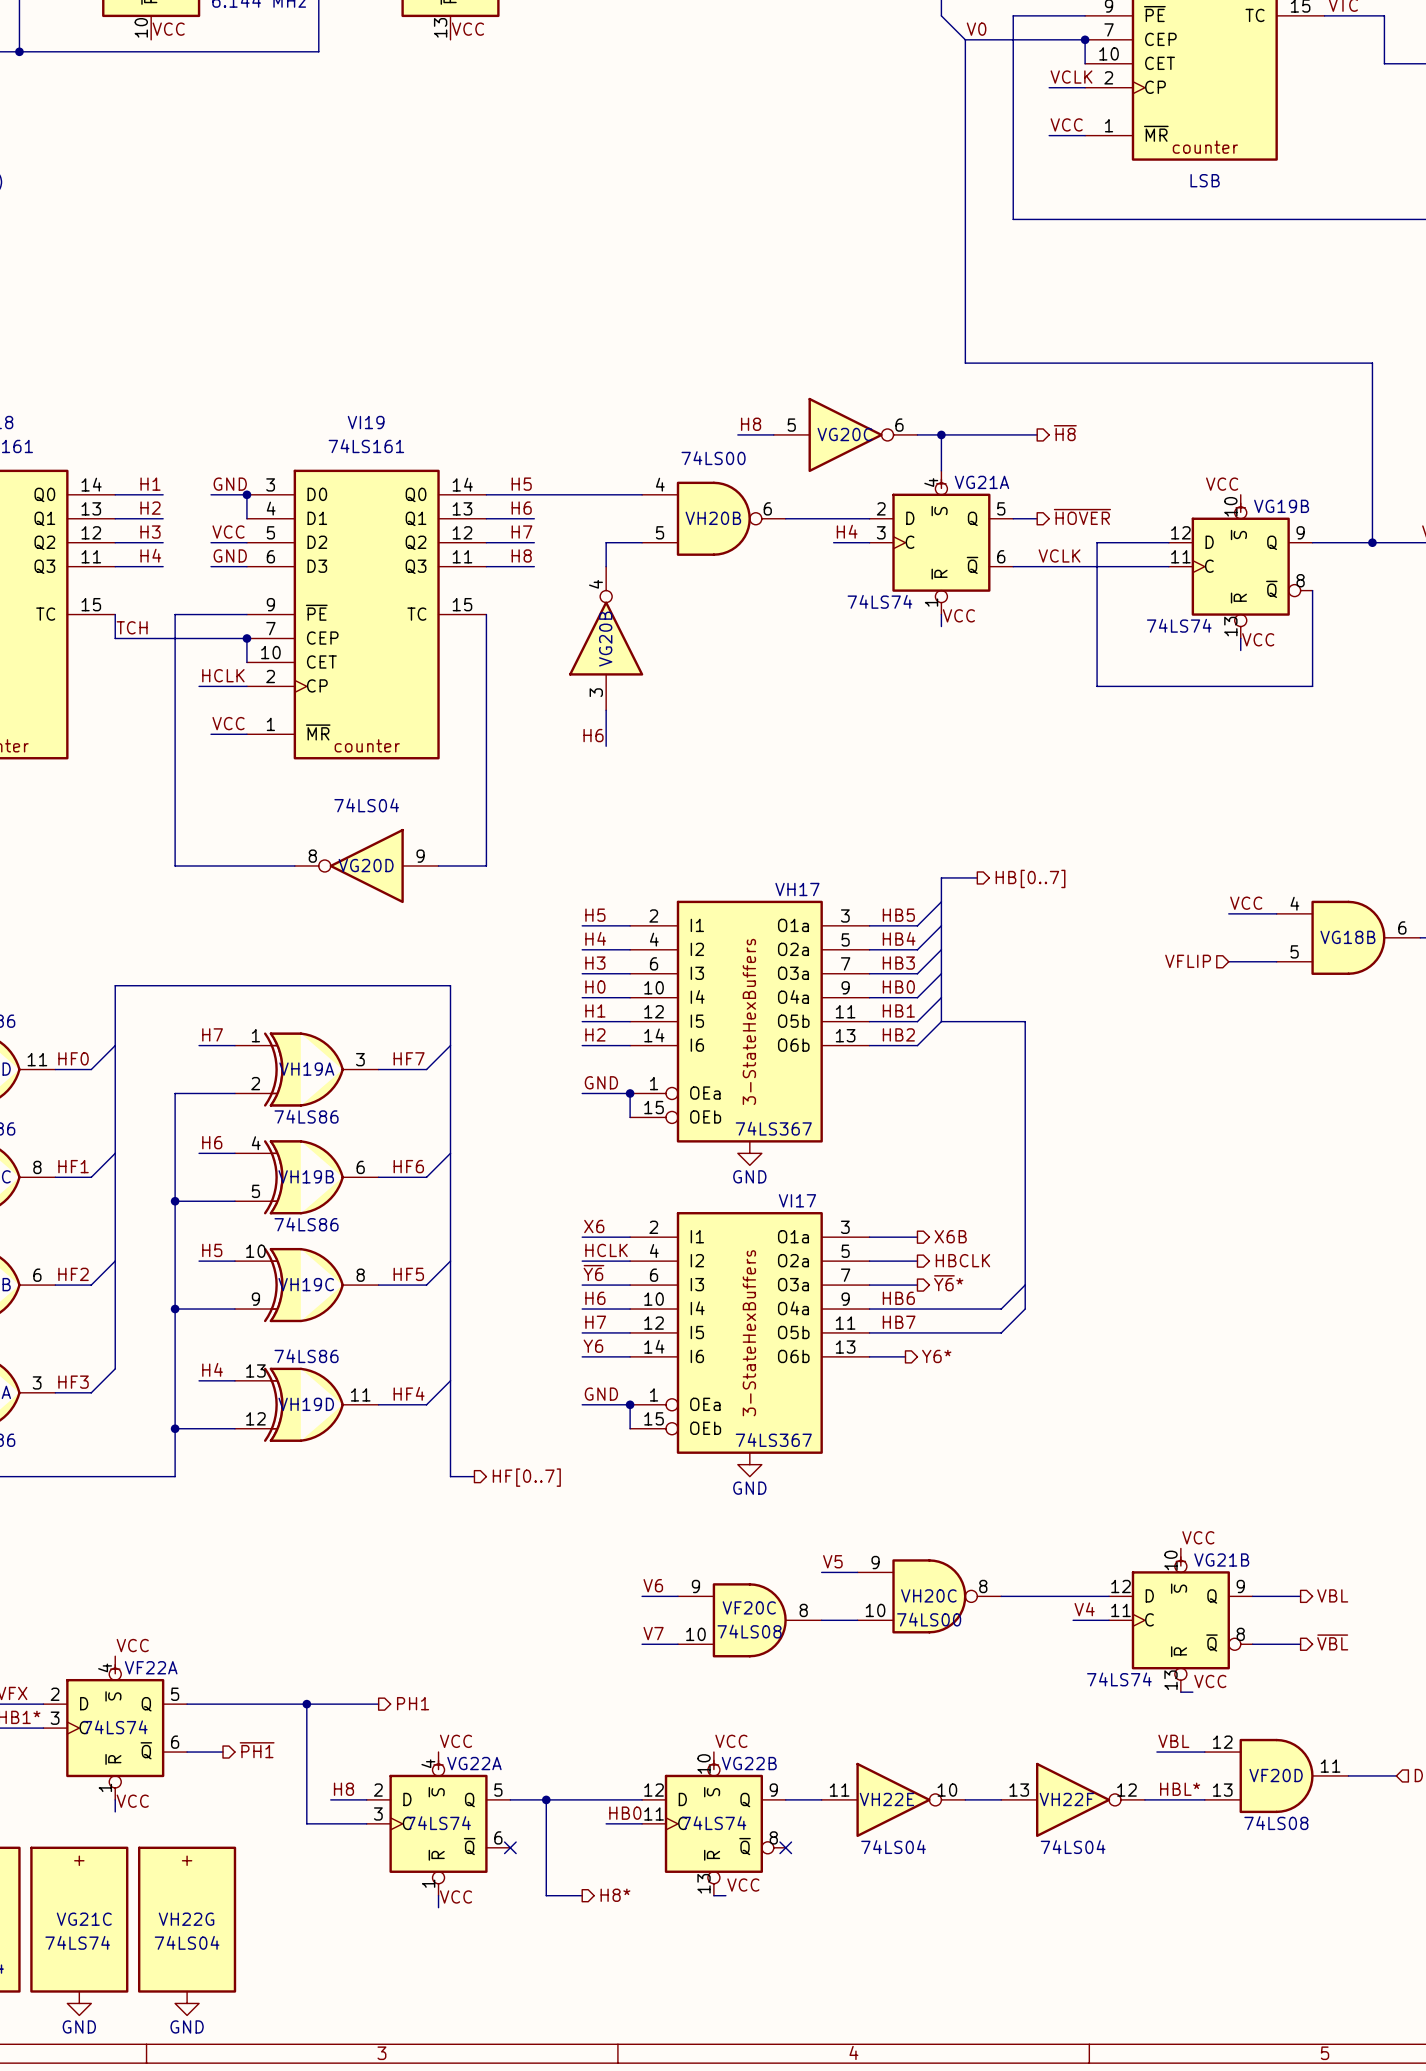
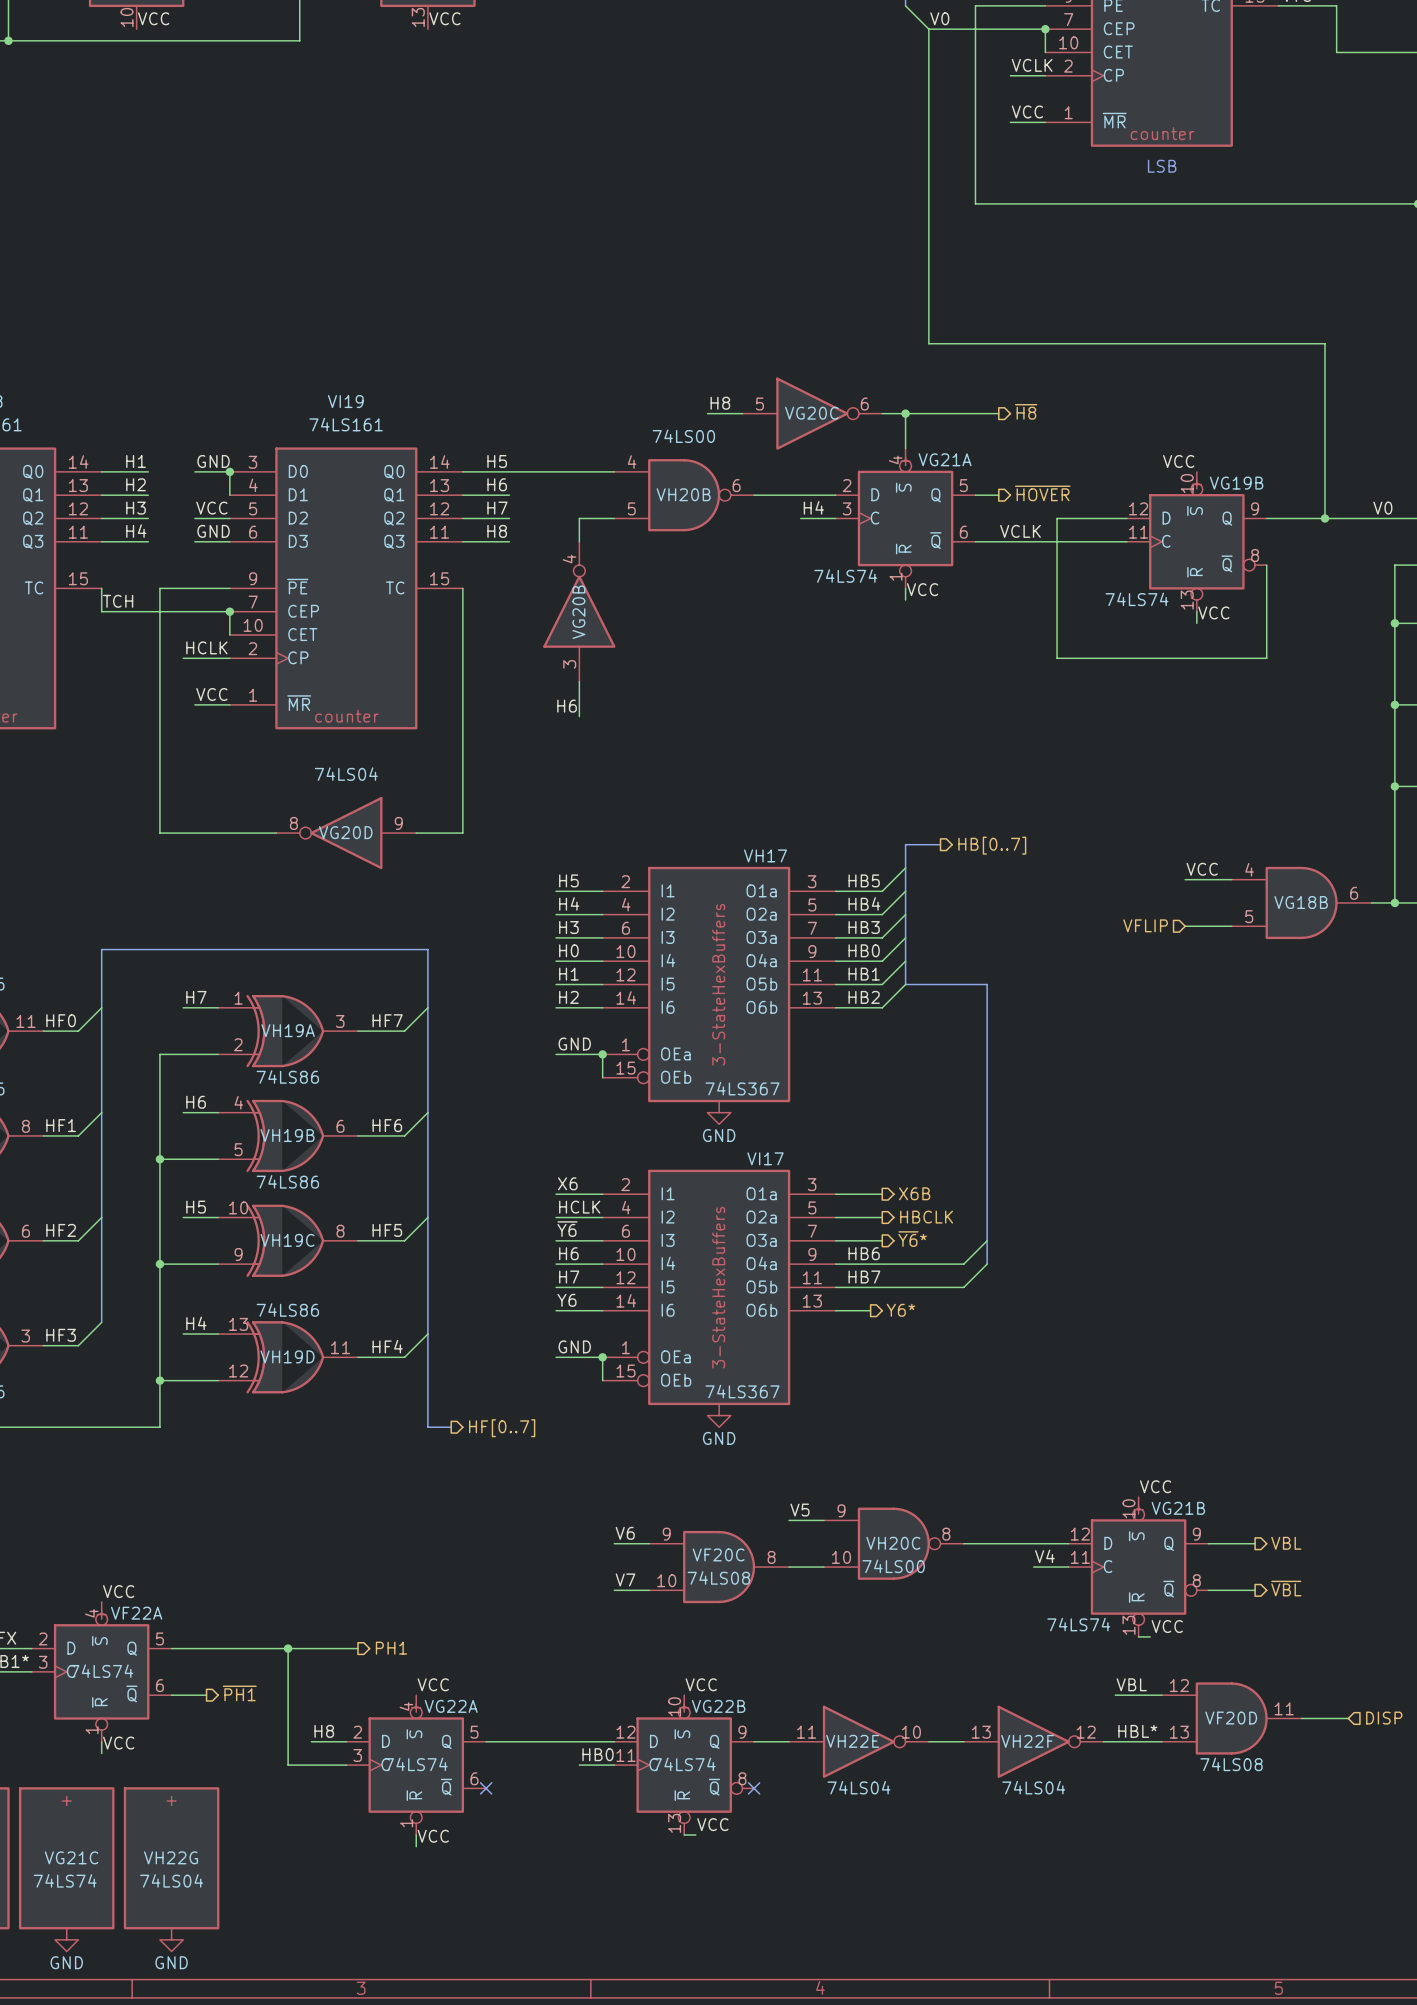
wire: (546, 1799) (546, 1895) (582, 1895) -> none
junction: (546, 1799) -> none
hierarchical label: H8* (615, 1895) -> none

